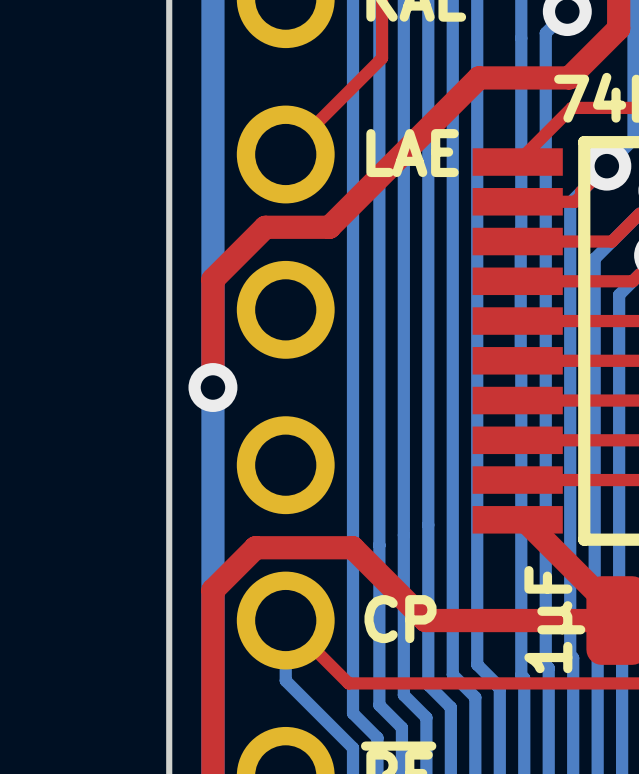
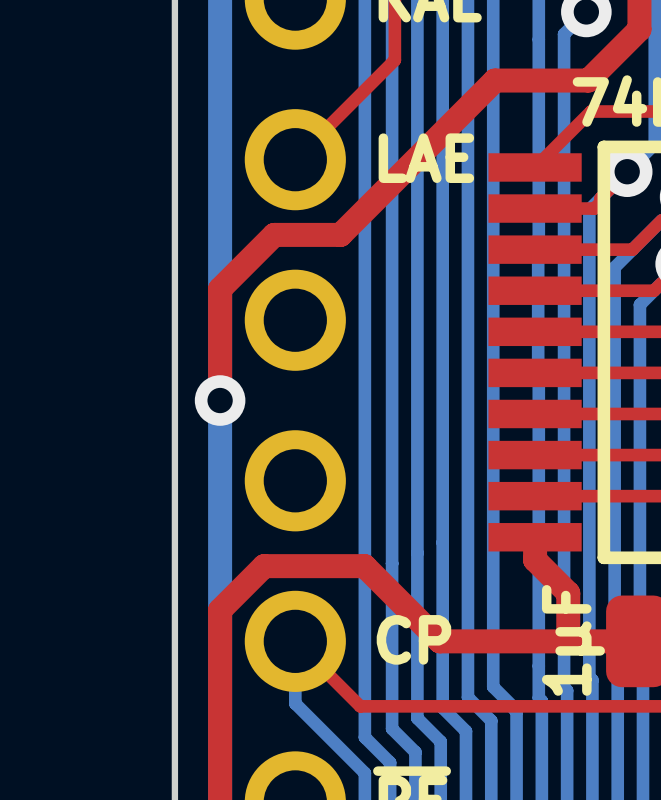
top track: none -> (535, 537) (535, 560) (568, 593) (568, 641)
top track: (524, 519) (616, 612) -> none

